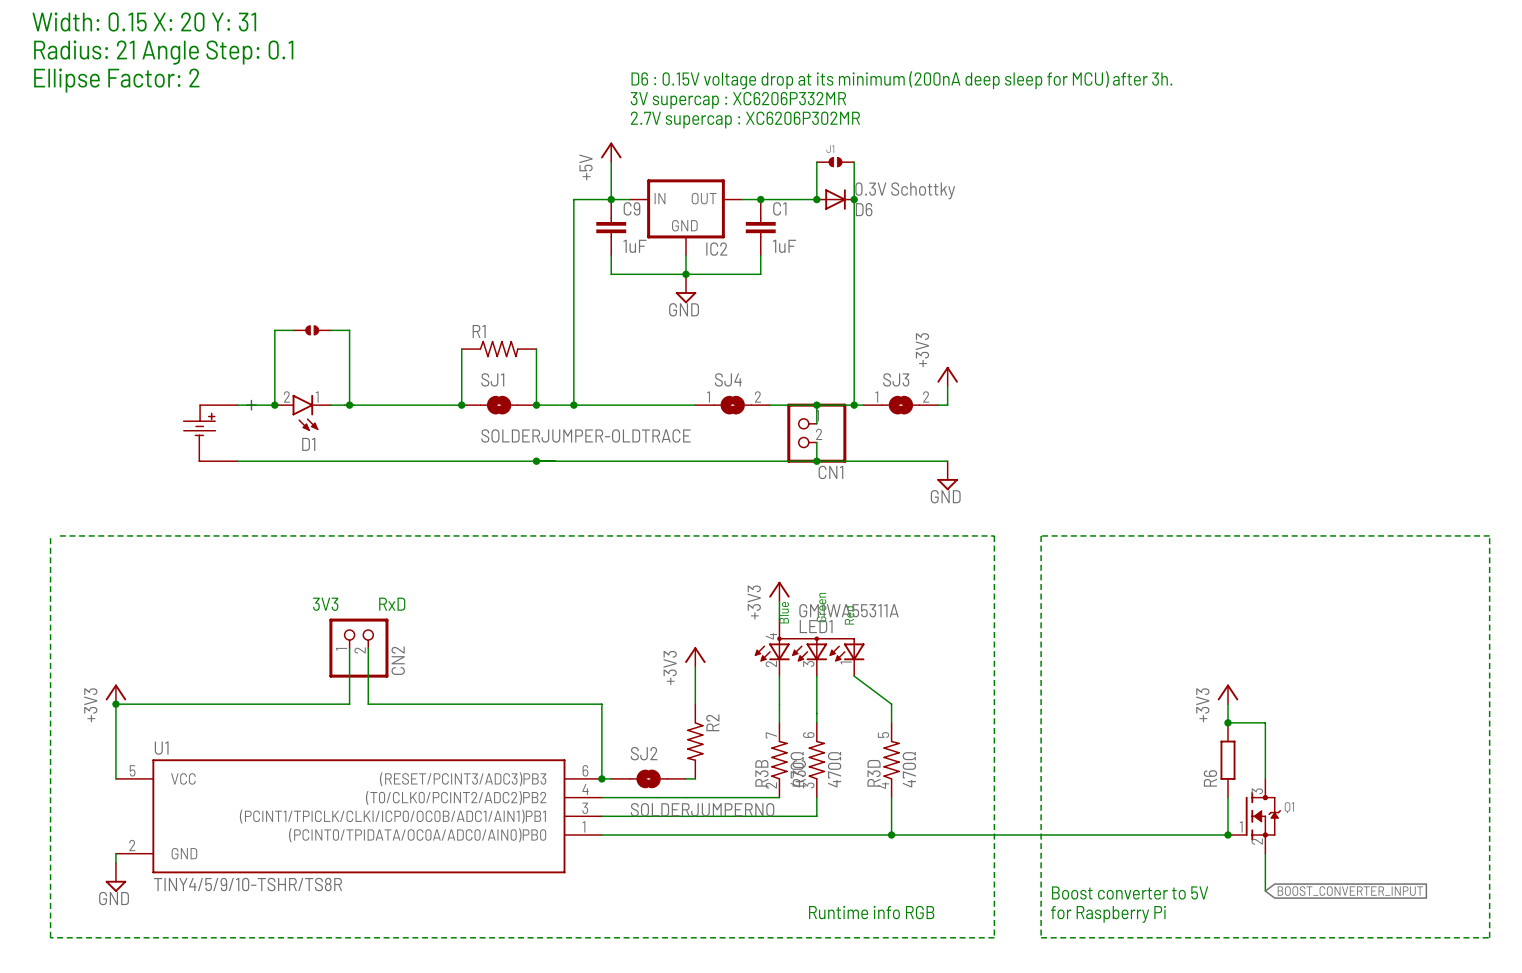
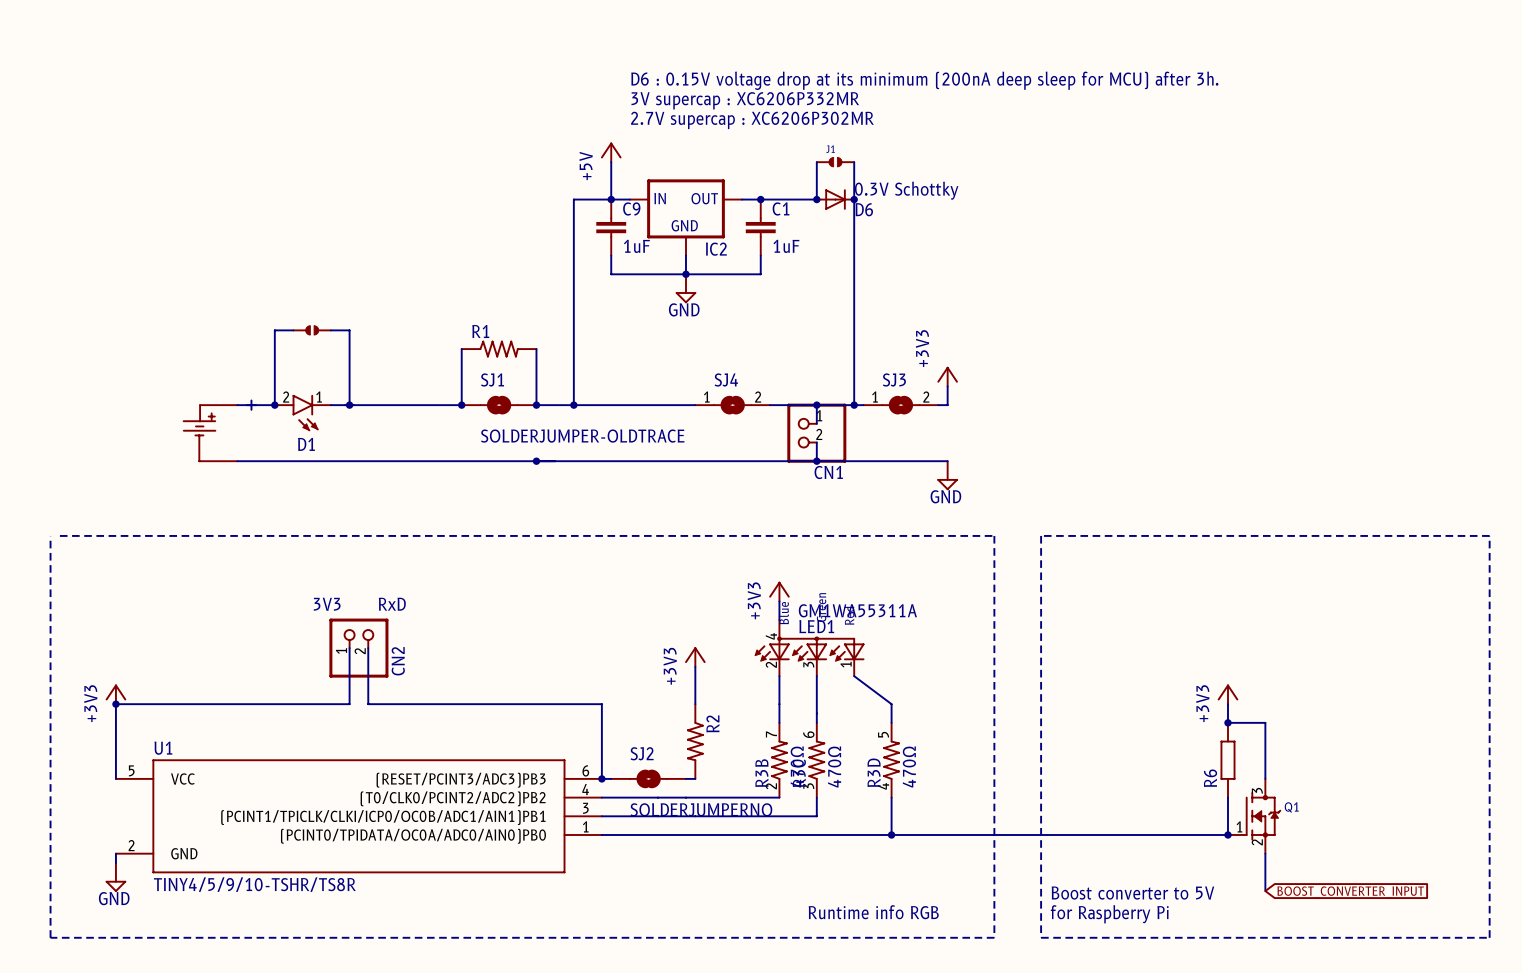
text: Width: 0.15 X: 20 Y: 31 (144, 22) -> none
text: Radius: 21 Angle Step: 0.1 (163, 52) -> none
text: Ellipse Factor: 2 (116, 80) -> none

